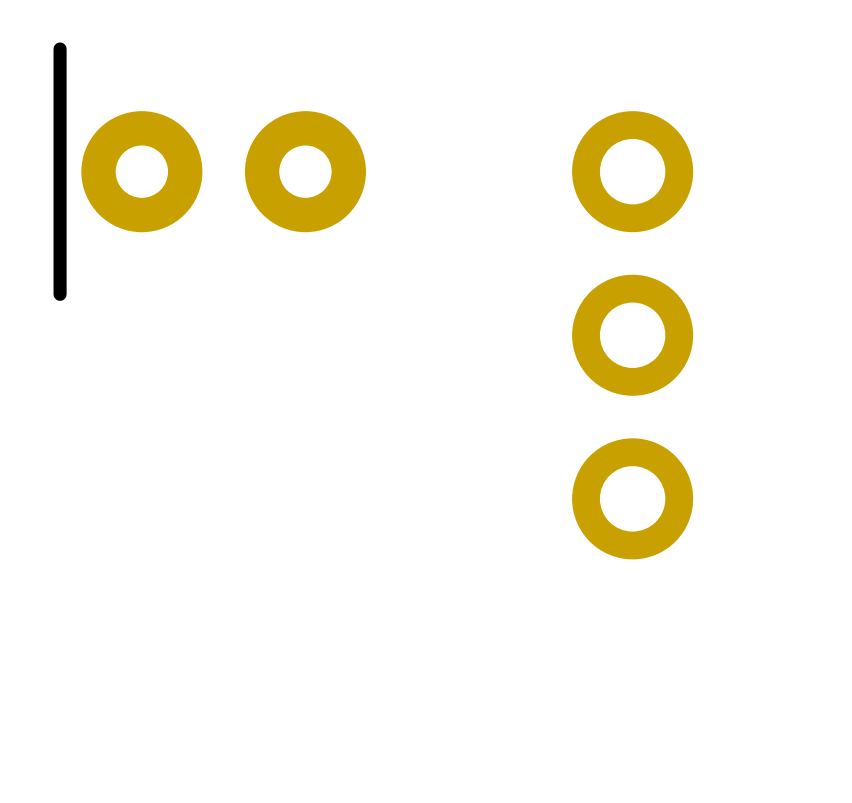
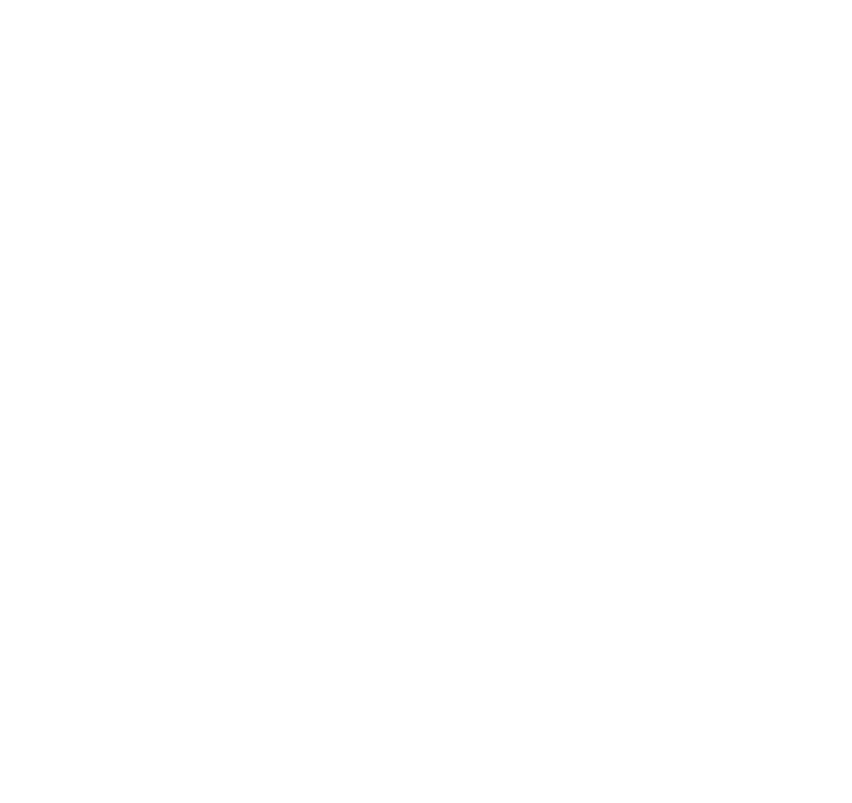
part: (209, 171) -> none
part: (632, 335) -> none

